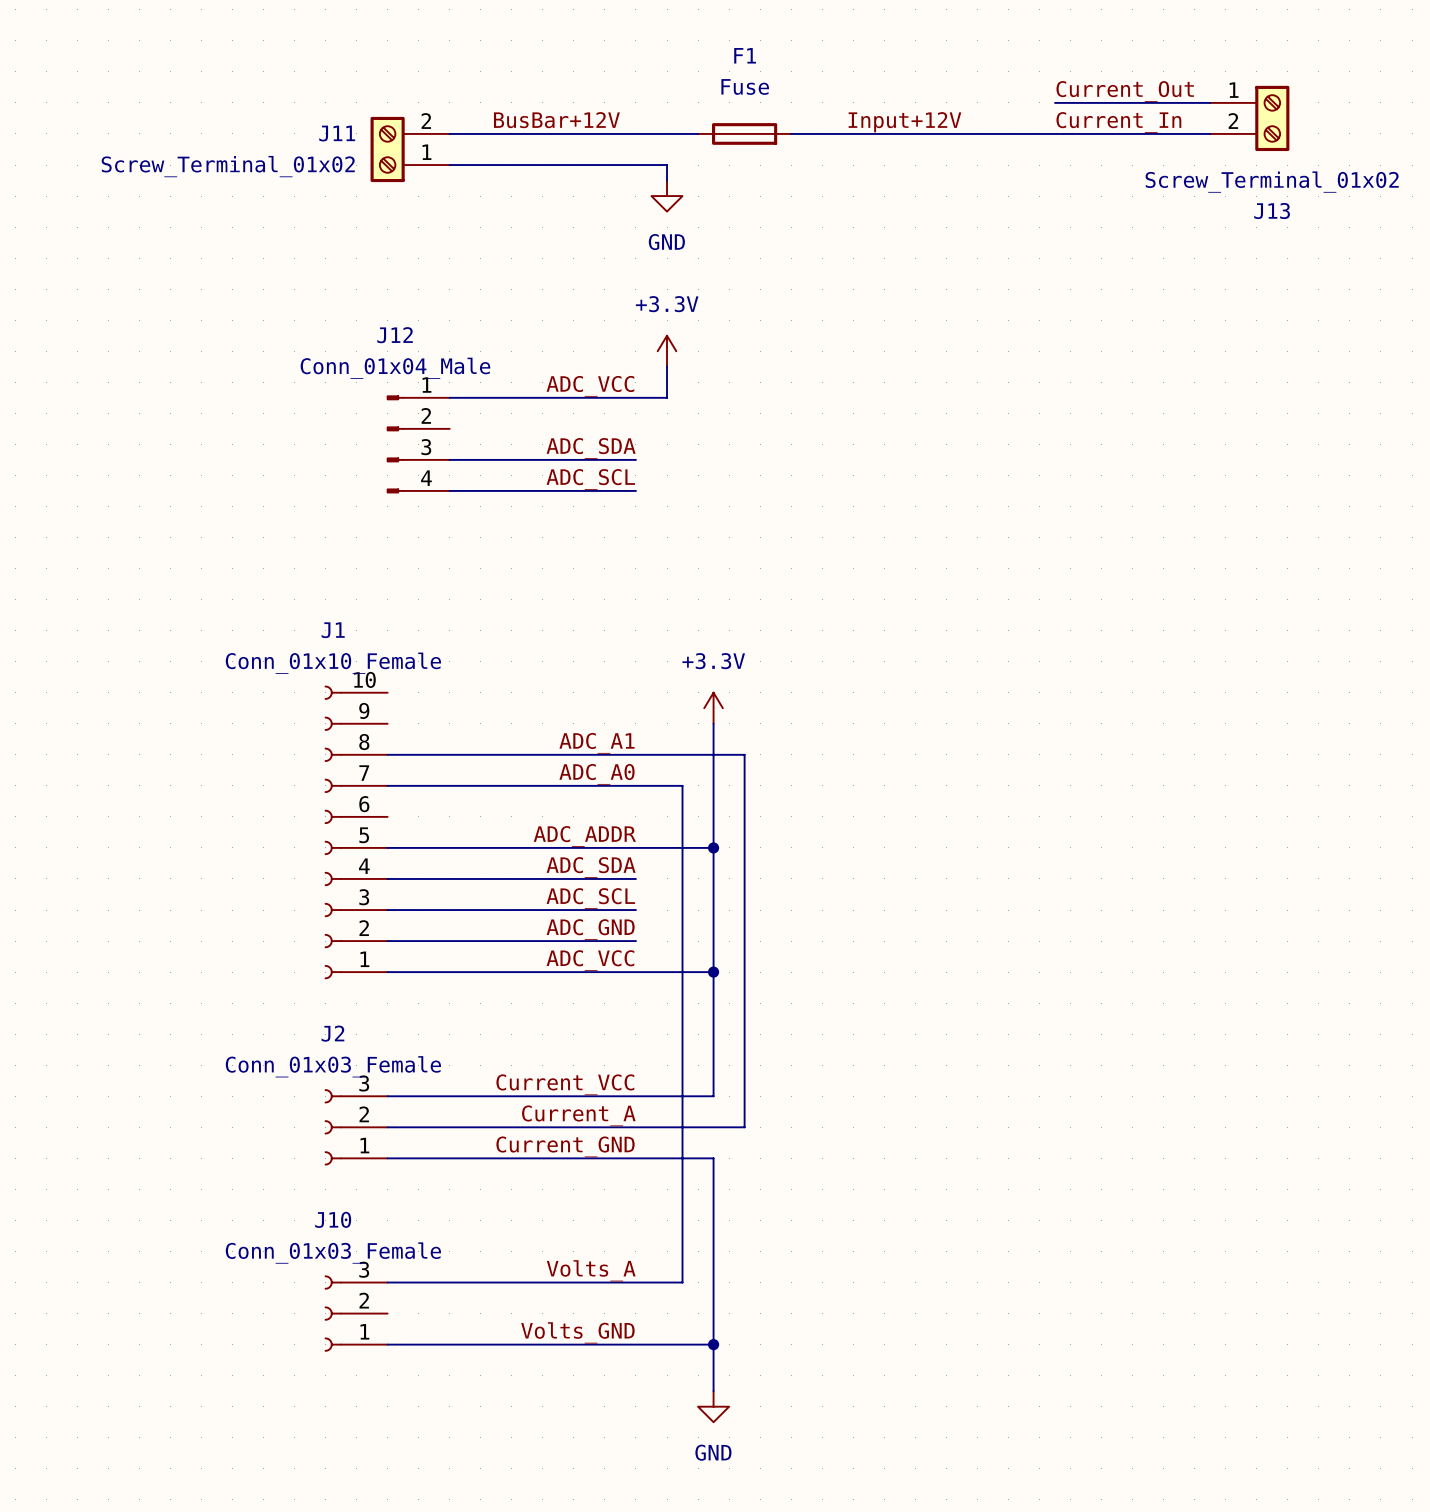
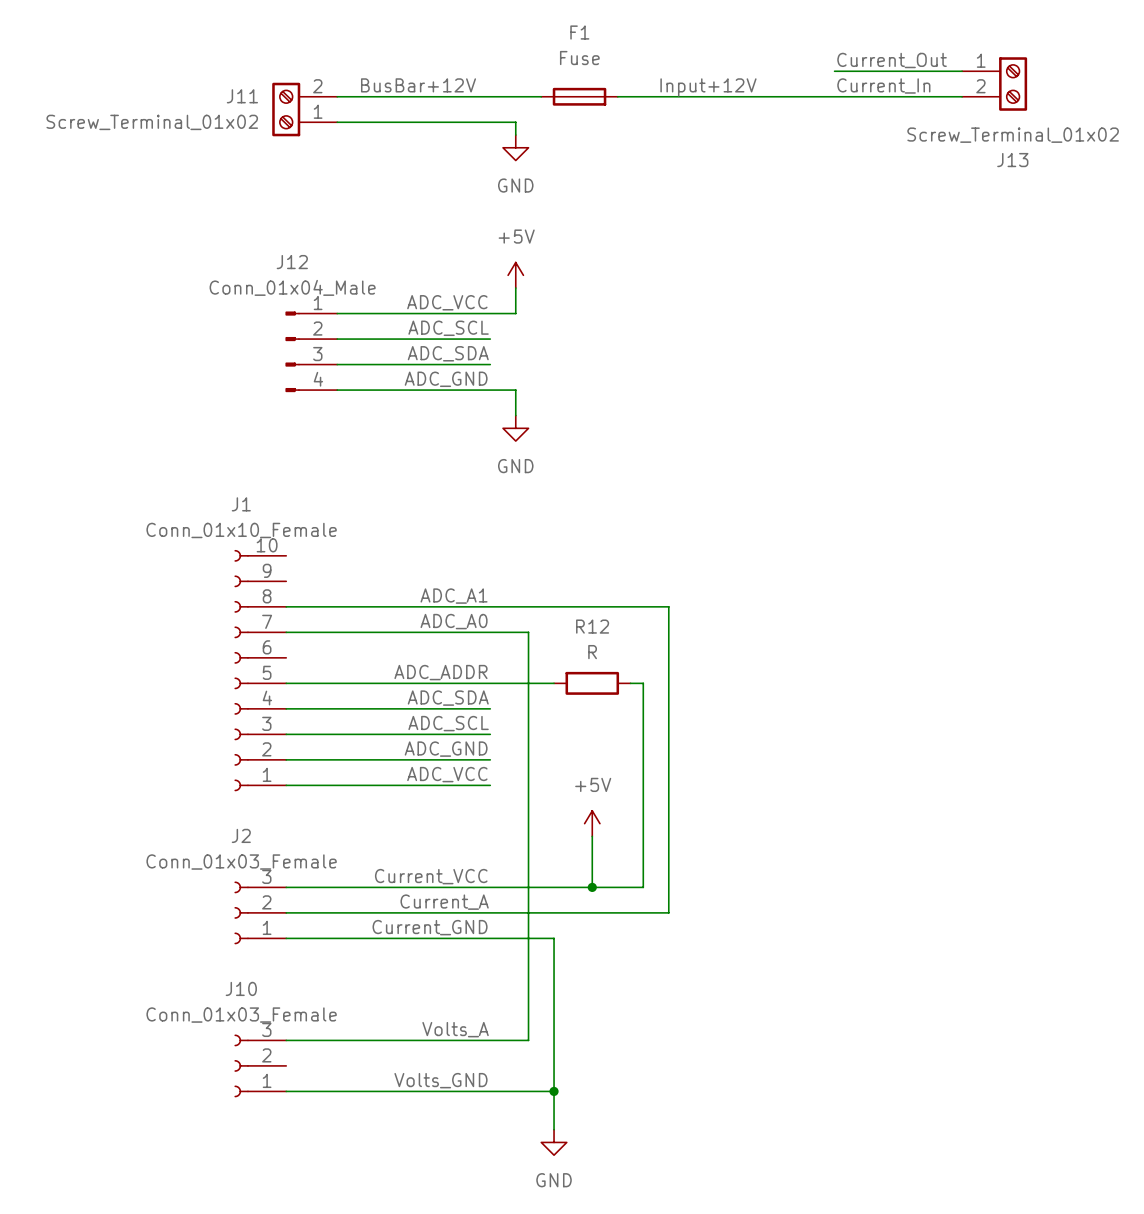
power symbol: +3.3V (667, 351) -> +5V (515, 275)
label: none -> ADC_SCL (448, 328)
wire: none -> (337, 339) (490, 339)
label: ADC_SCL (590, 479) -> ADC_GND (446, 379)
wire: none -> (490, 390) (515, 390) (515, 415)
power symbol: none -> GND (515, 428)
power symbol: +3.3V (713, 708) -> none
wire: (713, 723) (713, 1096) -> (630, 683) (643, 683) (643, 887) (554, 887)
wire: (744, 754) (744, 1127) -> (579, 606) (668, 606) (668, 912) (579, 912)
junction: (713, 847) -> none
R12: none -> R (592, 683)
wire: (635, 972) (713, 972) -> none
junction: (713, 972) -> none
power symbol: none -> +5V (592, 823)
wire: none -> (592, 836) (592, 887)
junction: none -> (592, 887)

